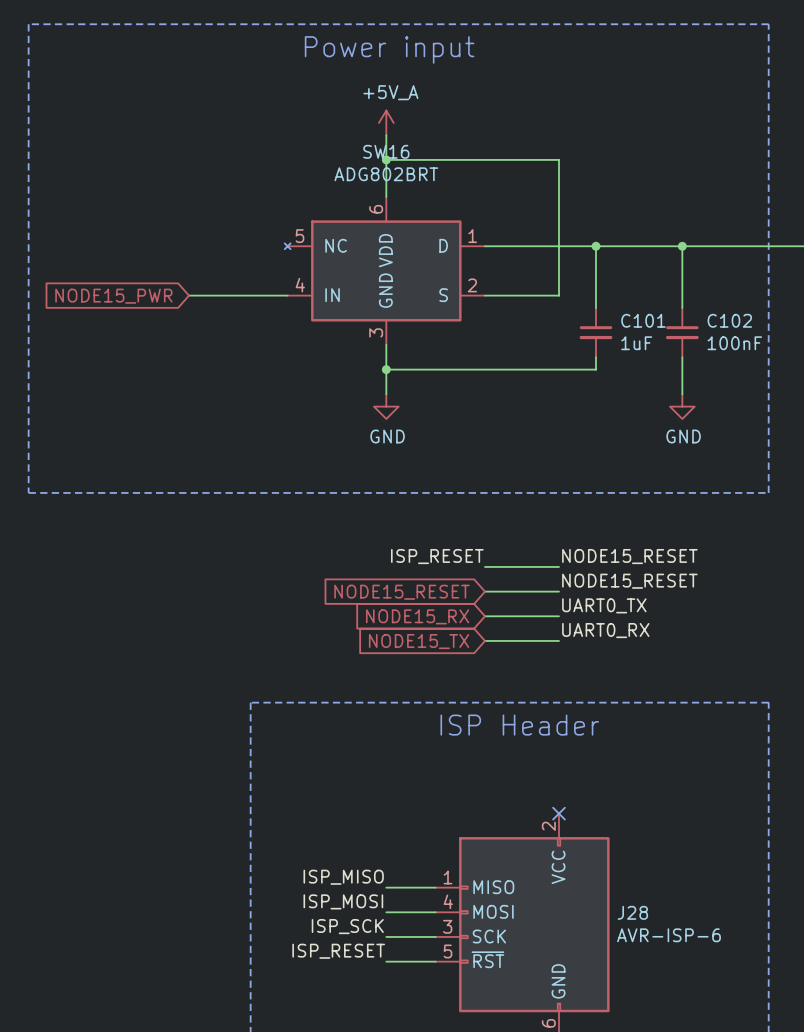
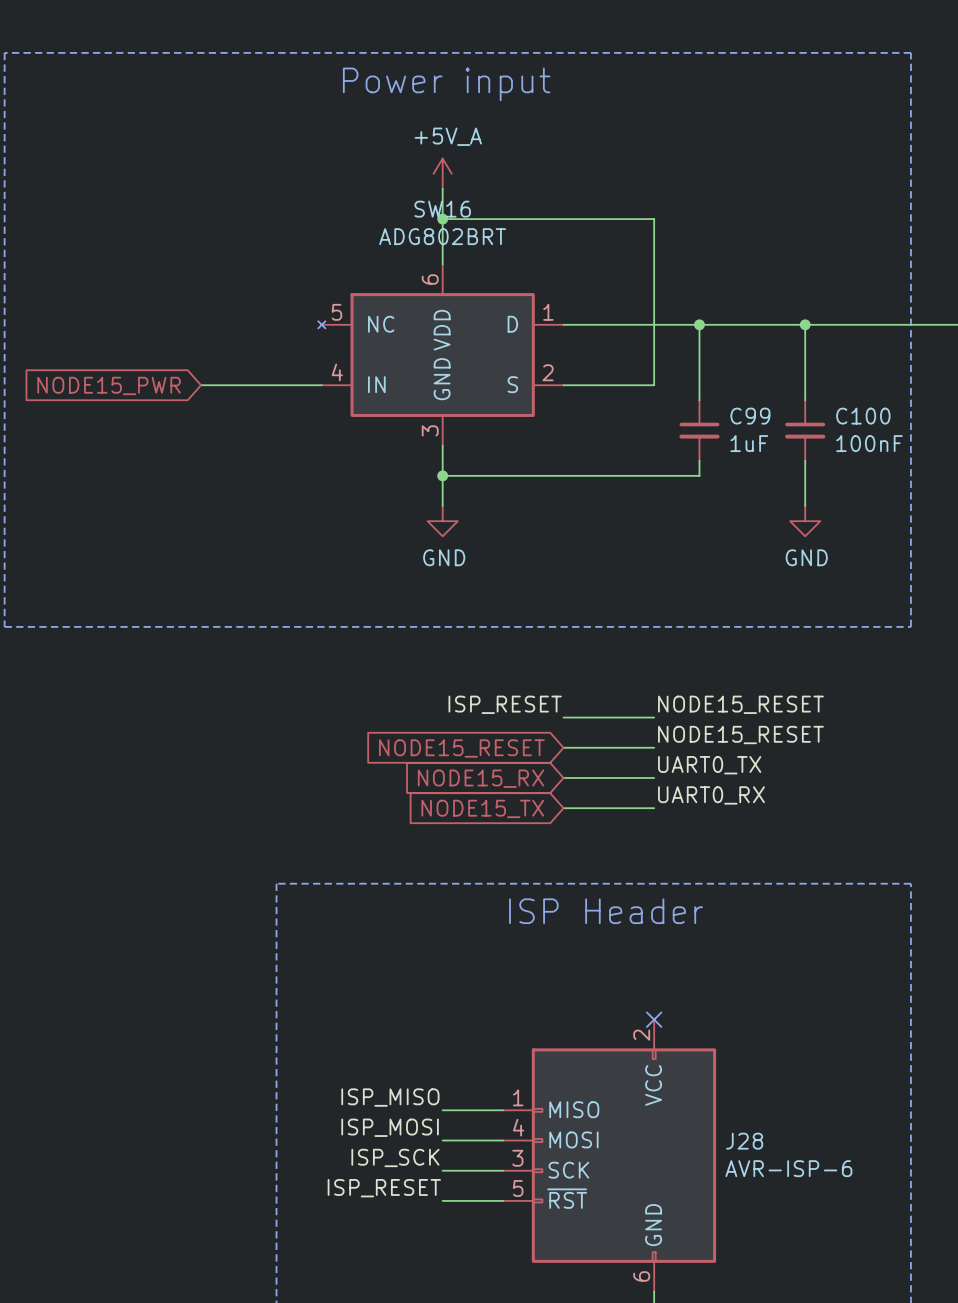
C101 name: C101 (643, 320) -> C99 (750, 416)
C102 name: C102 (729, 320) -> C100 (863, 416)

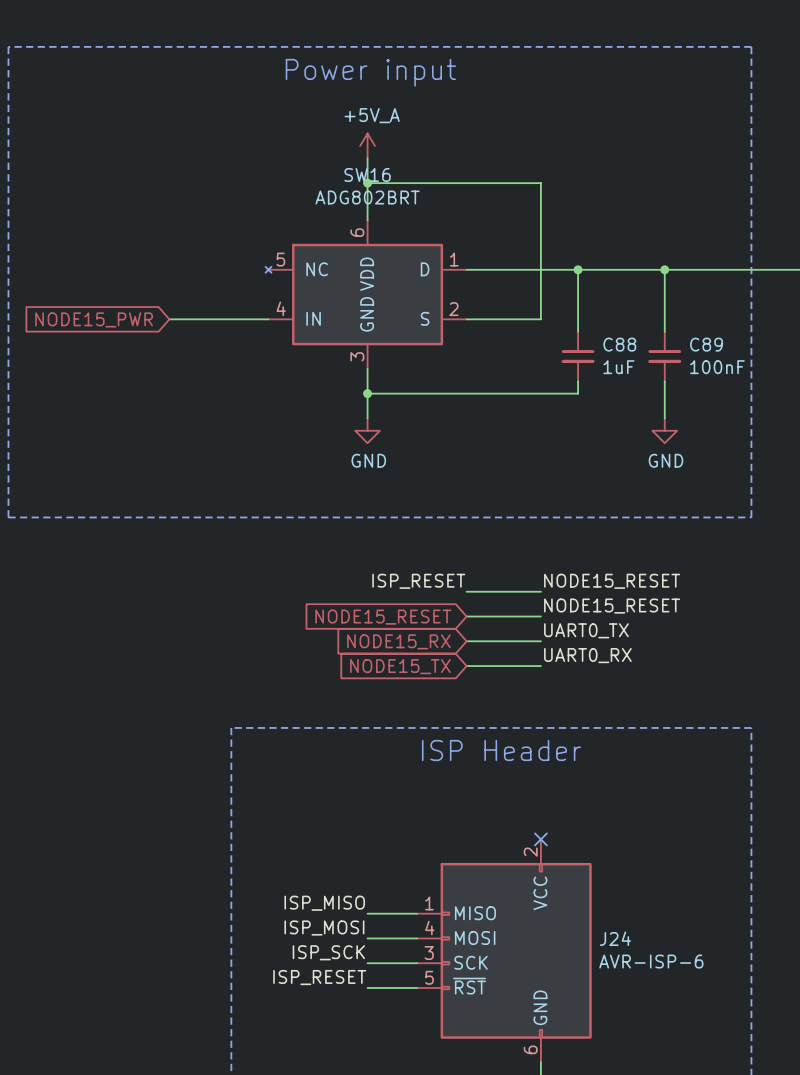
C99 name: C99 (750, 416) -> C88 (619, 344)
C100 name: C100 (863, 416) -> C89 (706, 344)
J28 name: J28 (744, 1141) -> J24 (615, 938)

